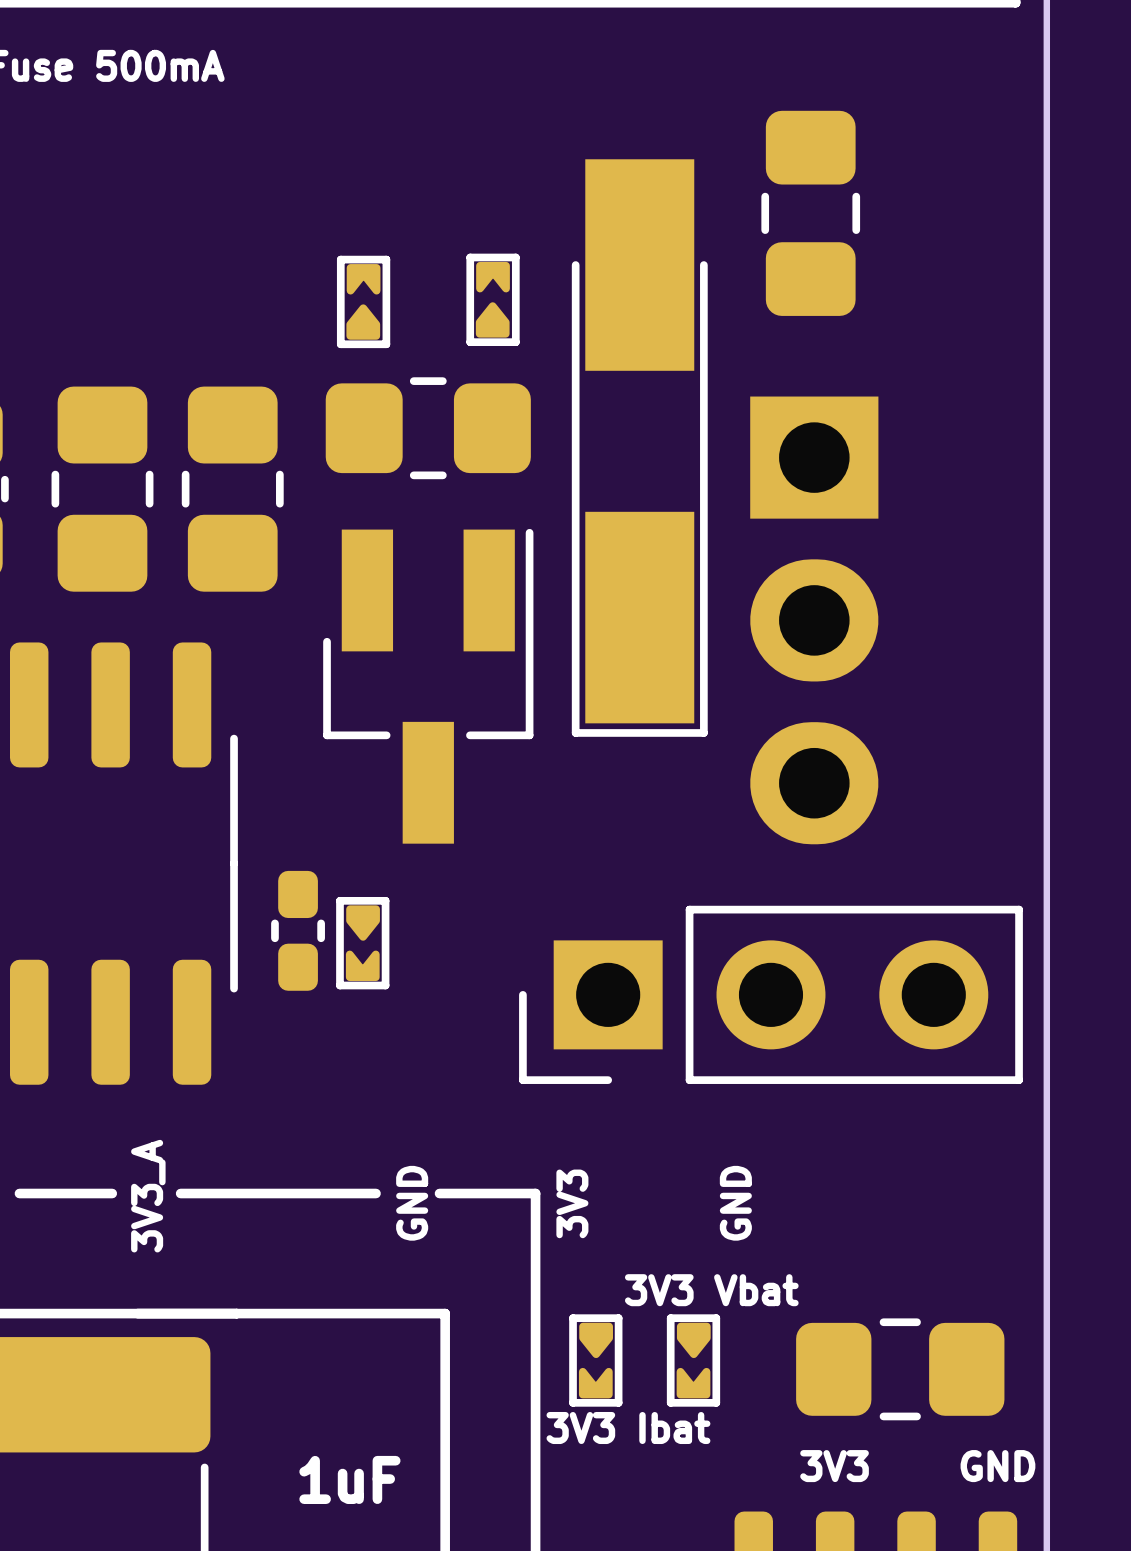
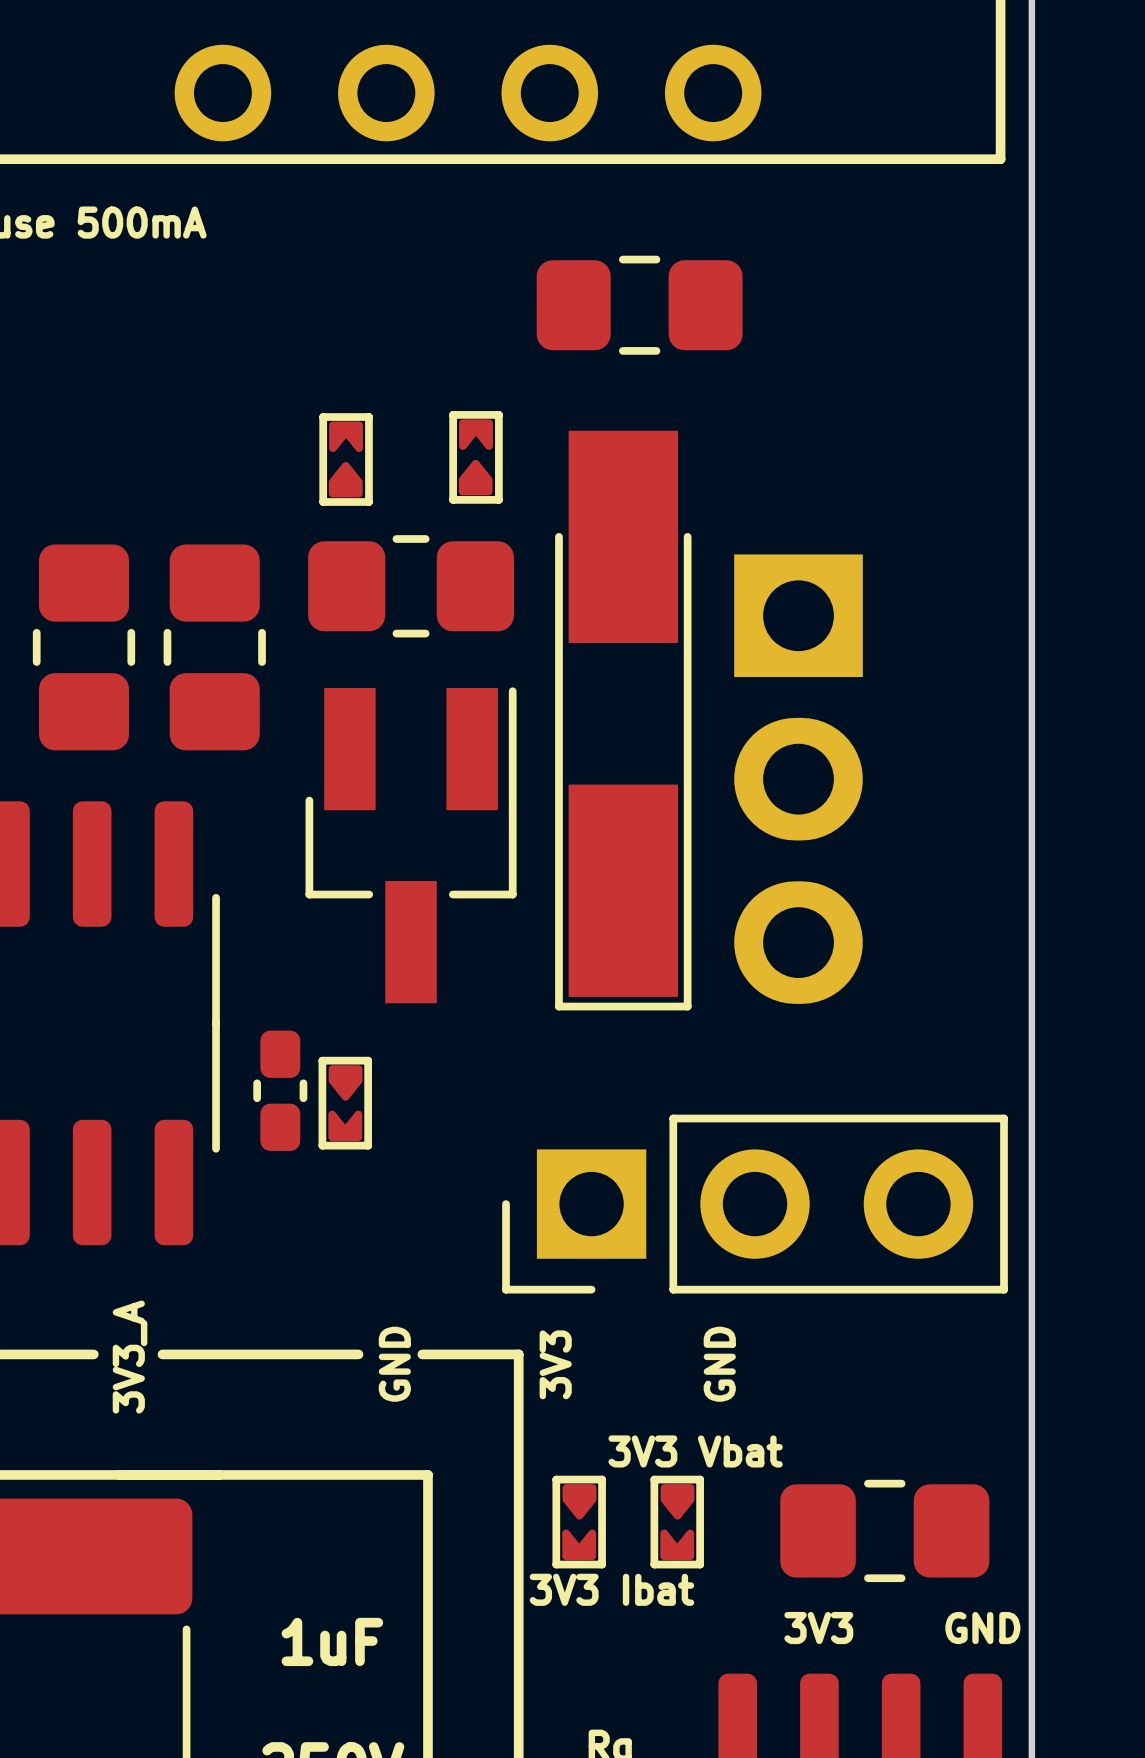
part rotation: 0° (810, 213) -> 90° clockwise (639, 305)
part position: (810, 213) -> (639, 305)
part position: (639, 448) -> (623, 720)
part position: (770, 994) -> (755, 1204)

